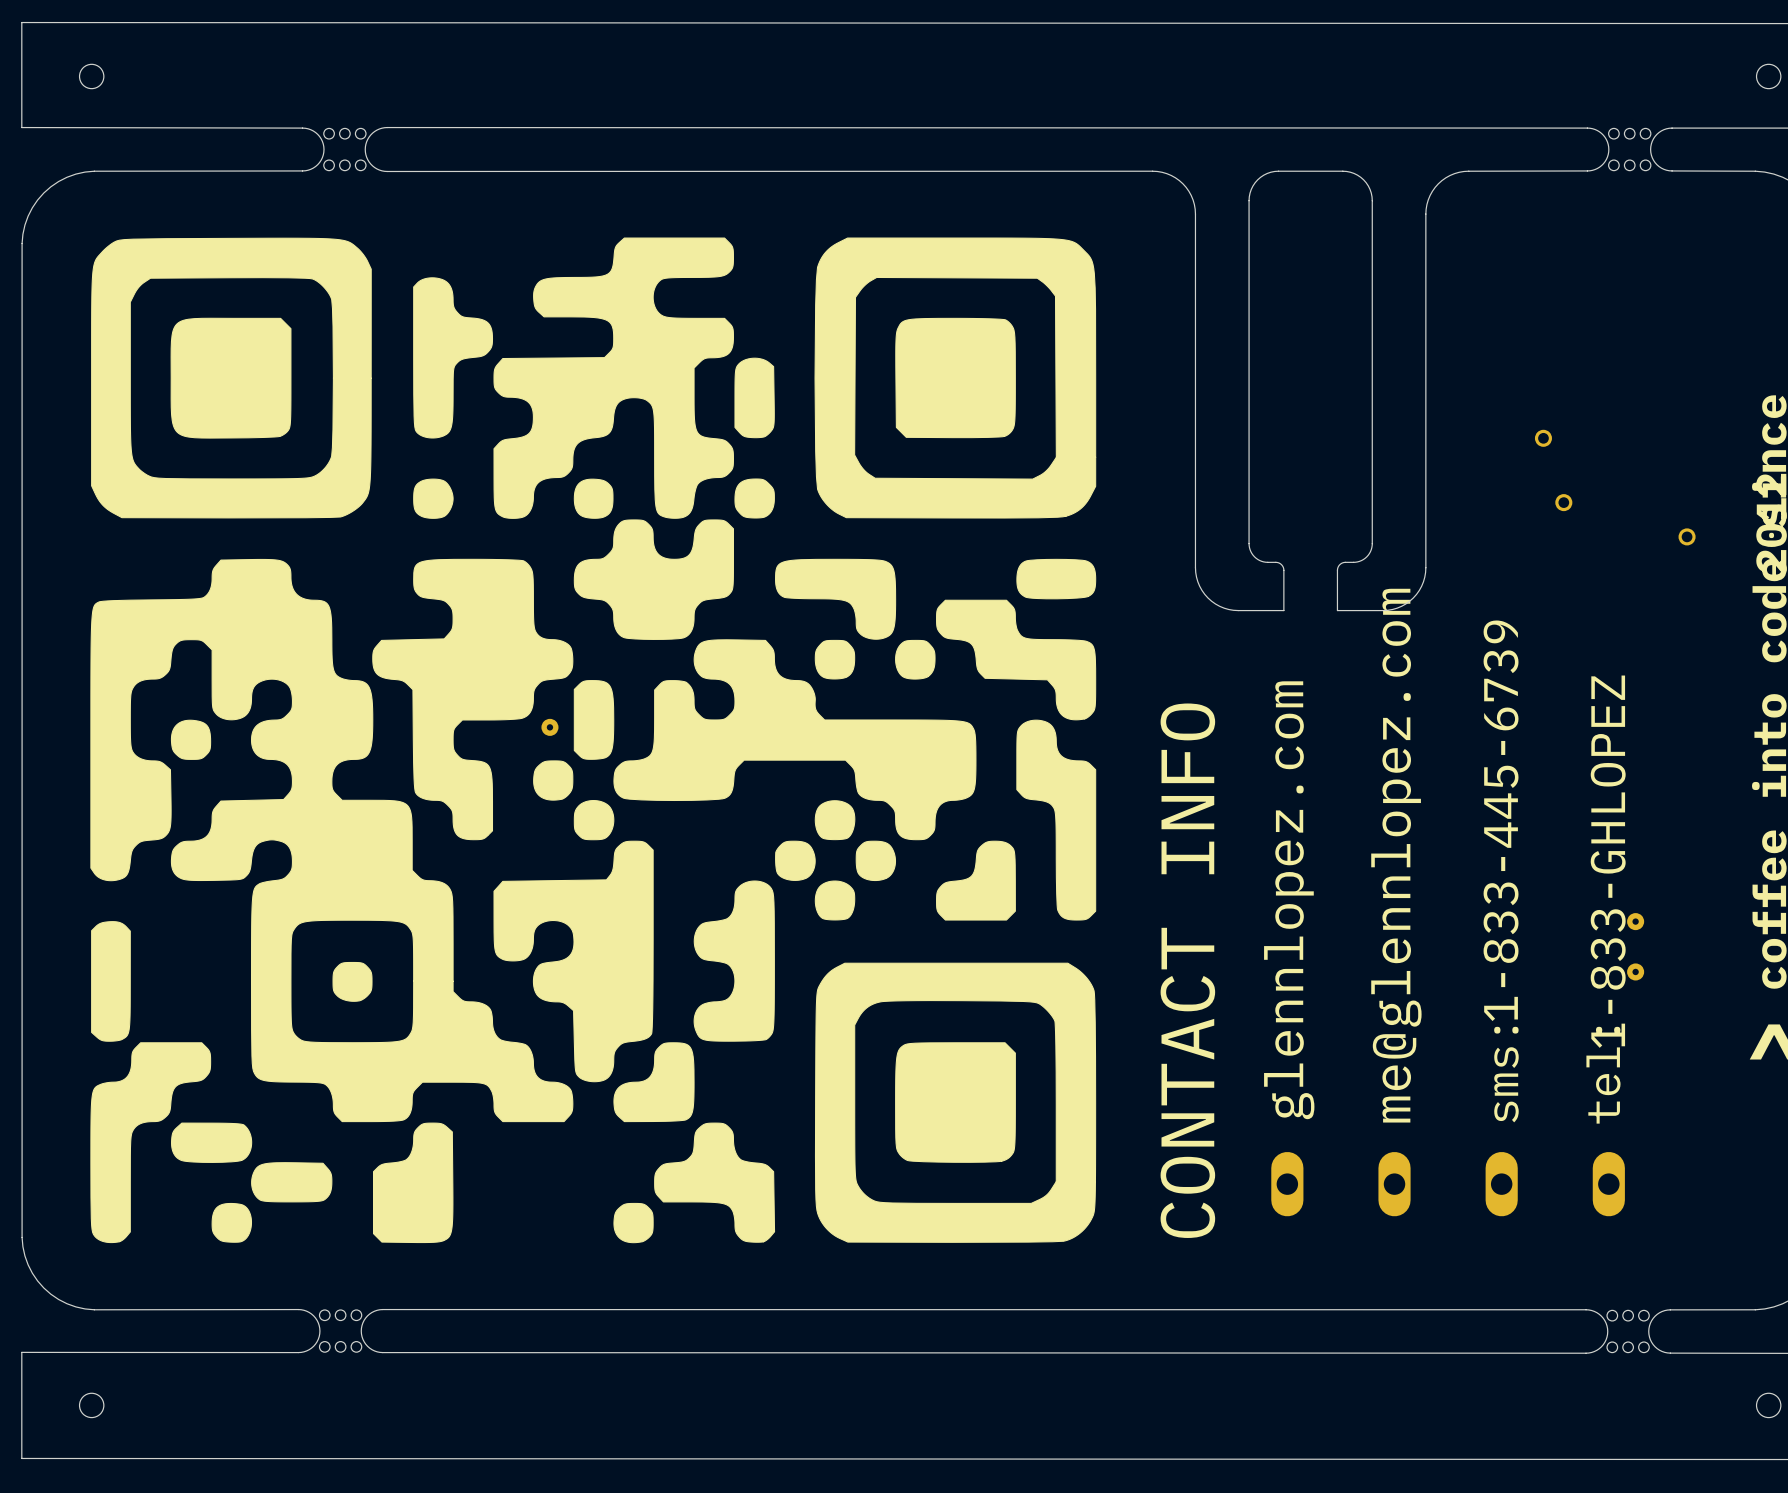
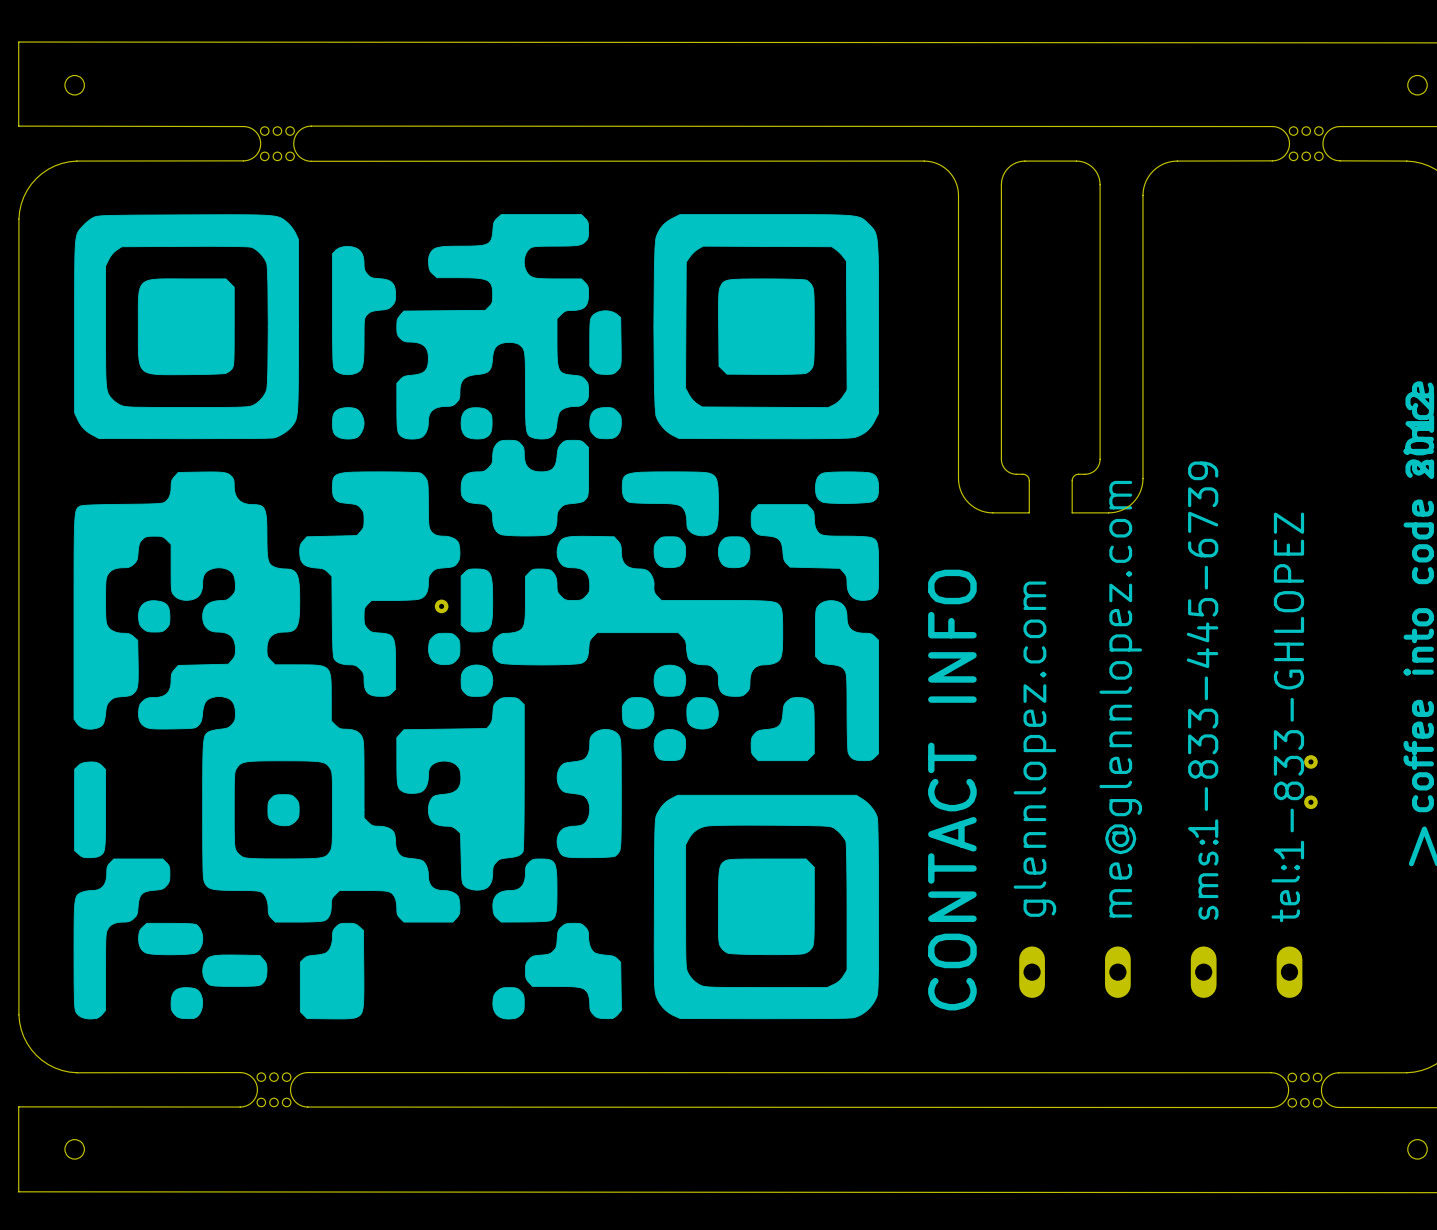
part: (1543, 438) -> none
part: (1563, 502) -> none
part: (1687, 536) -> none

